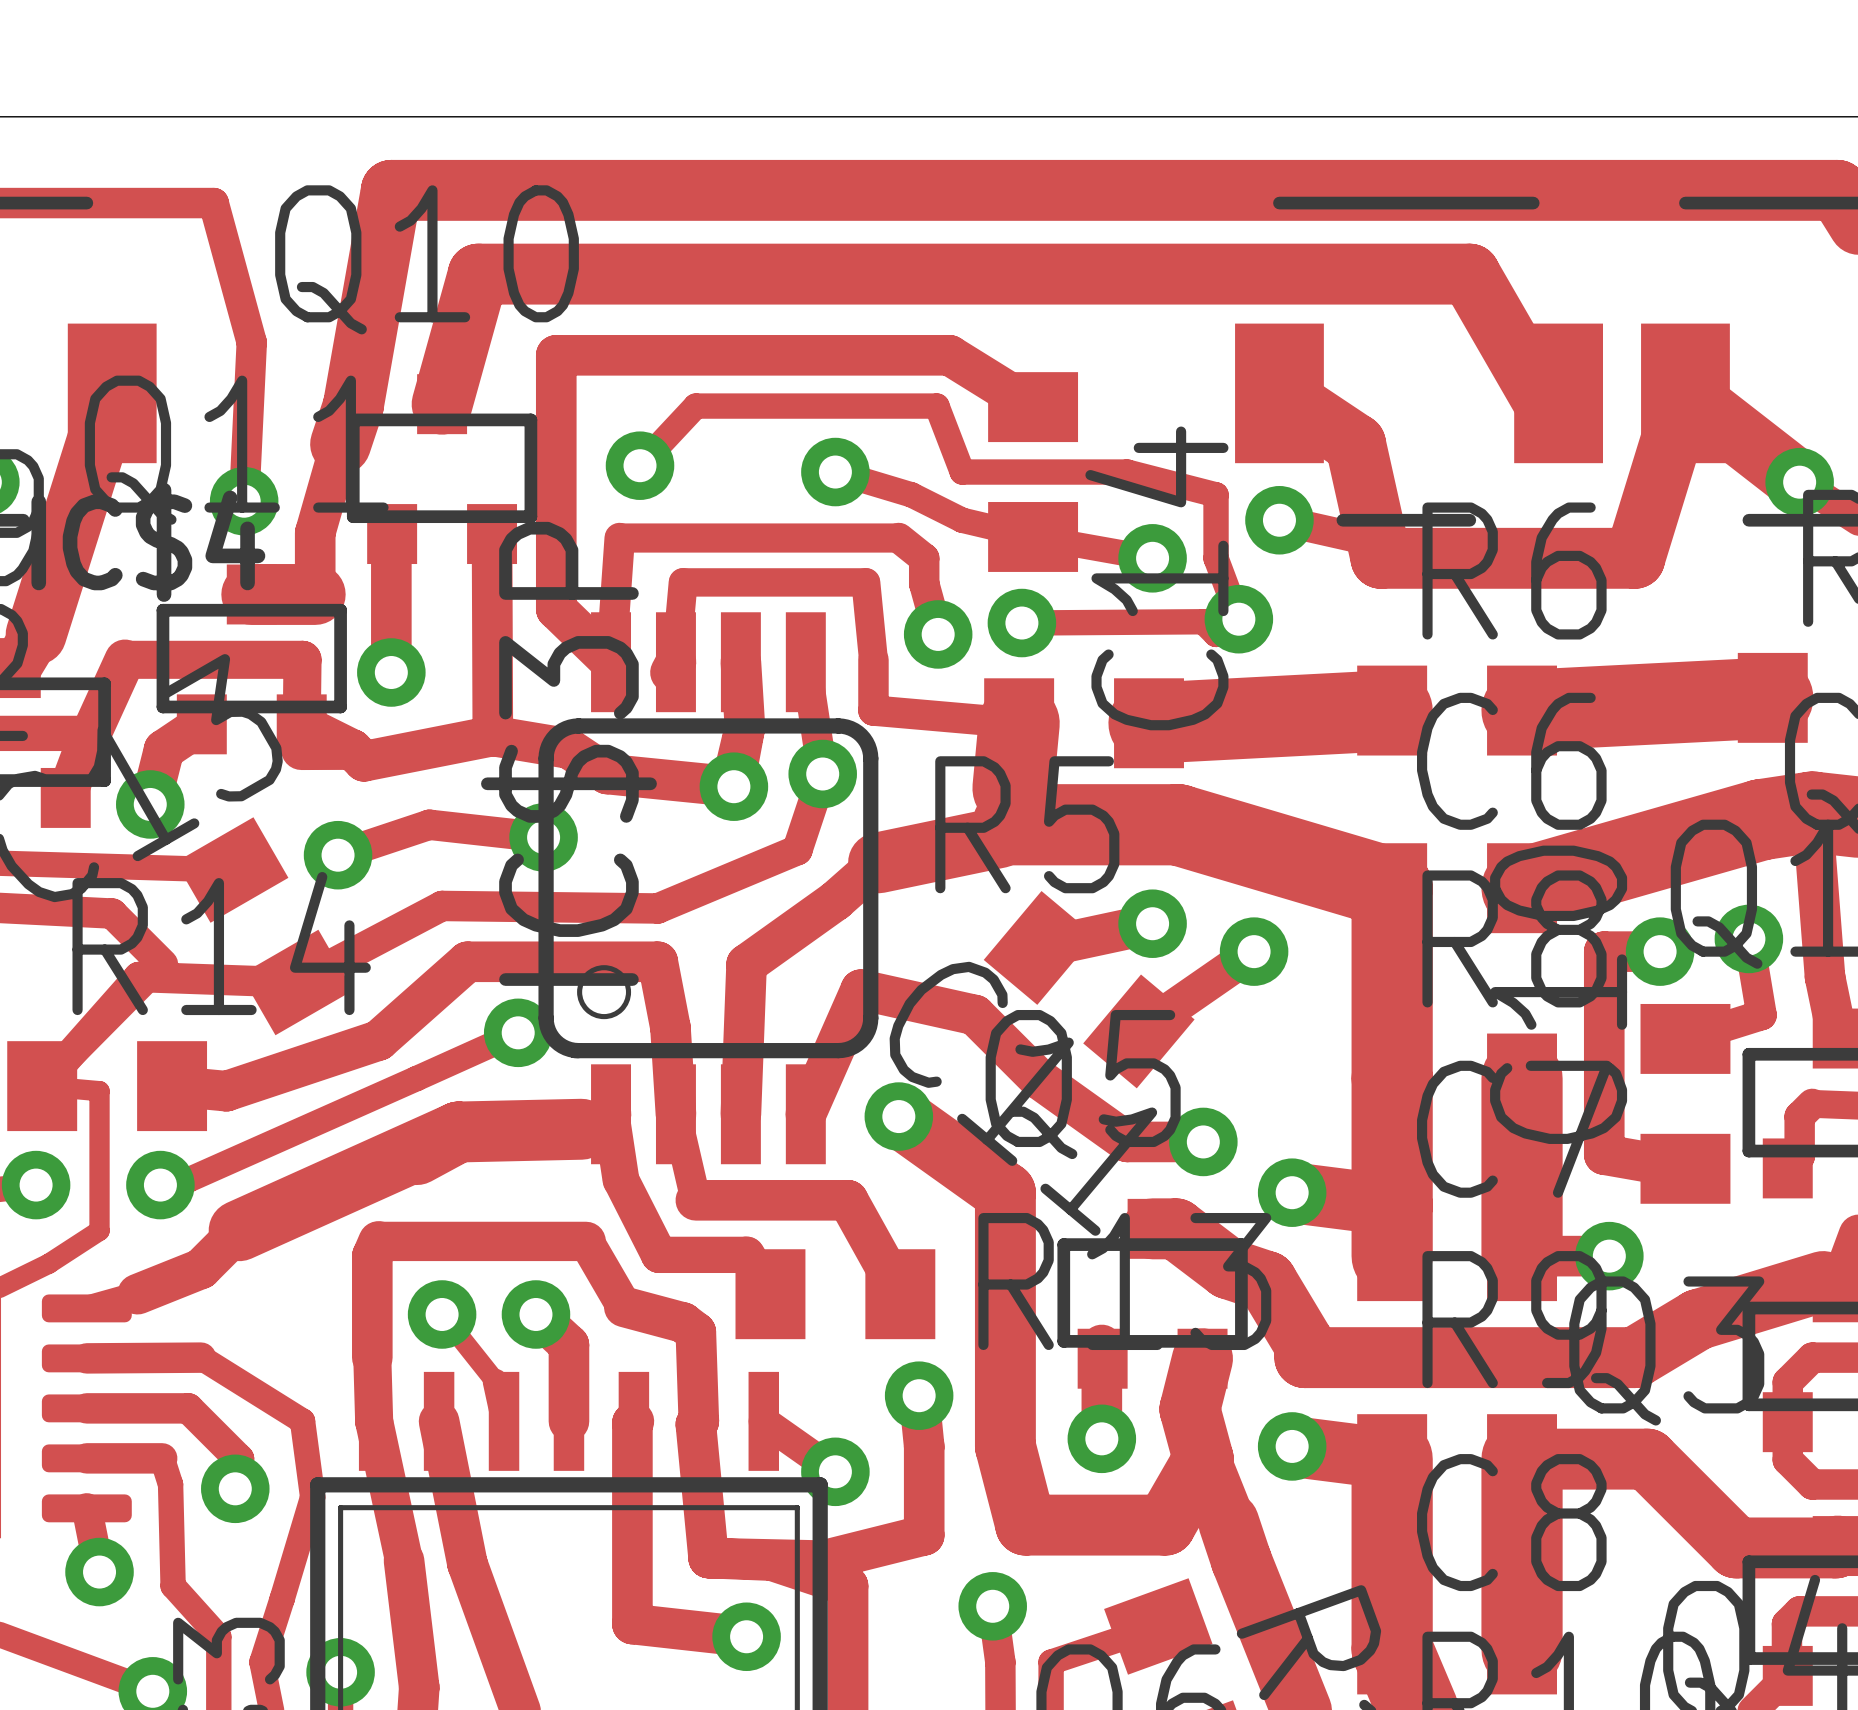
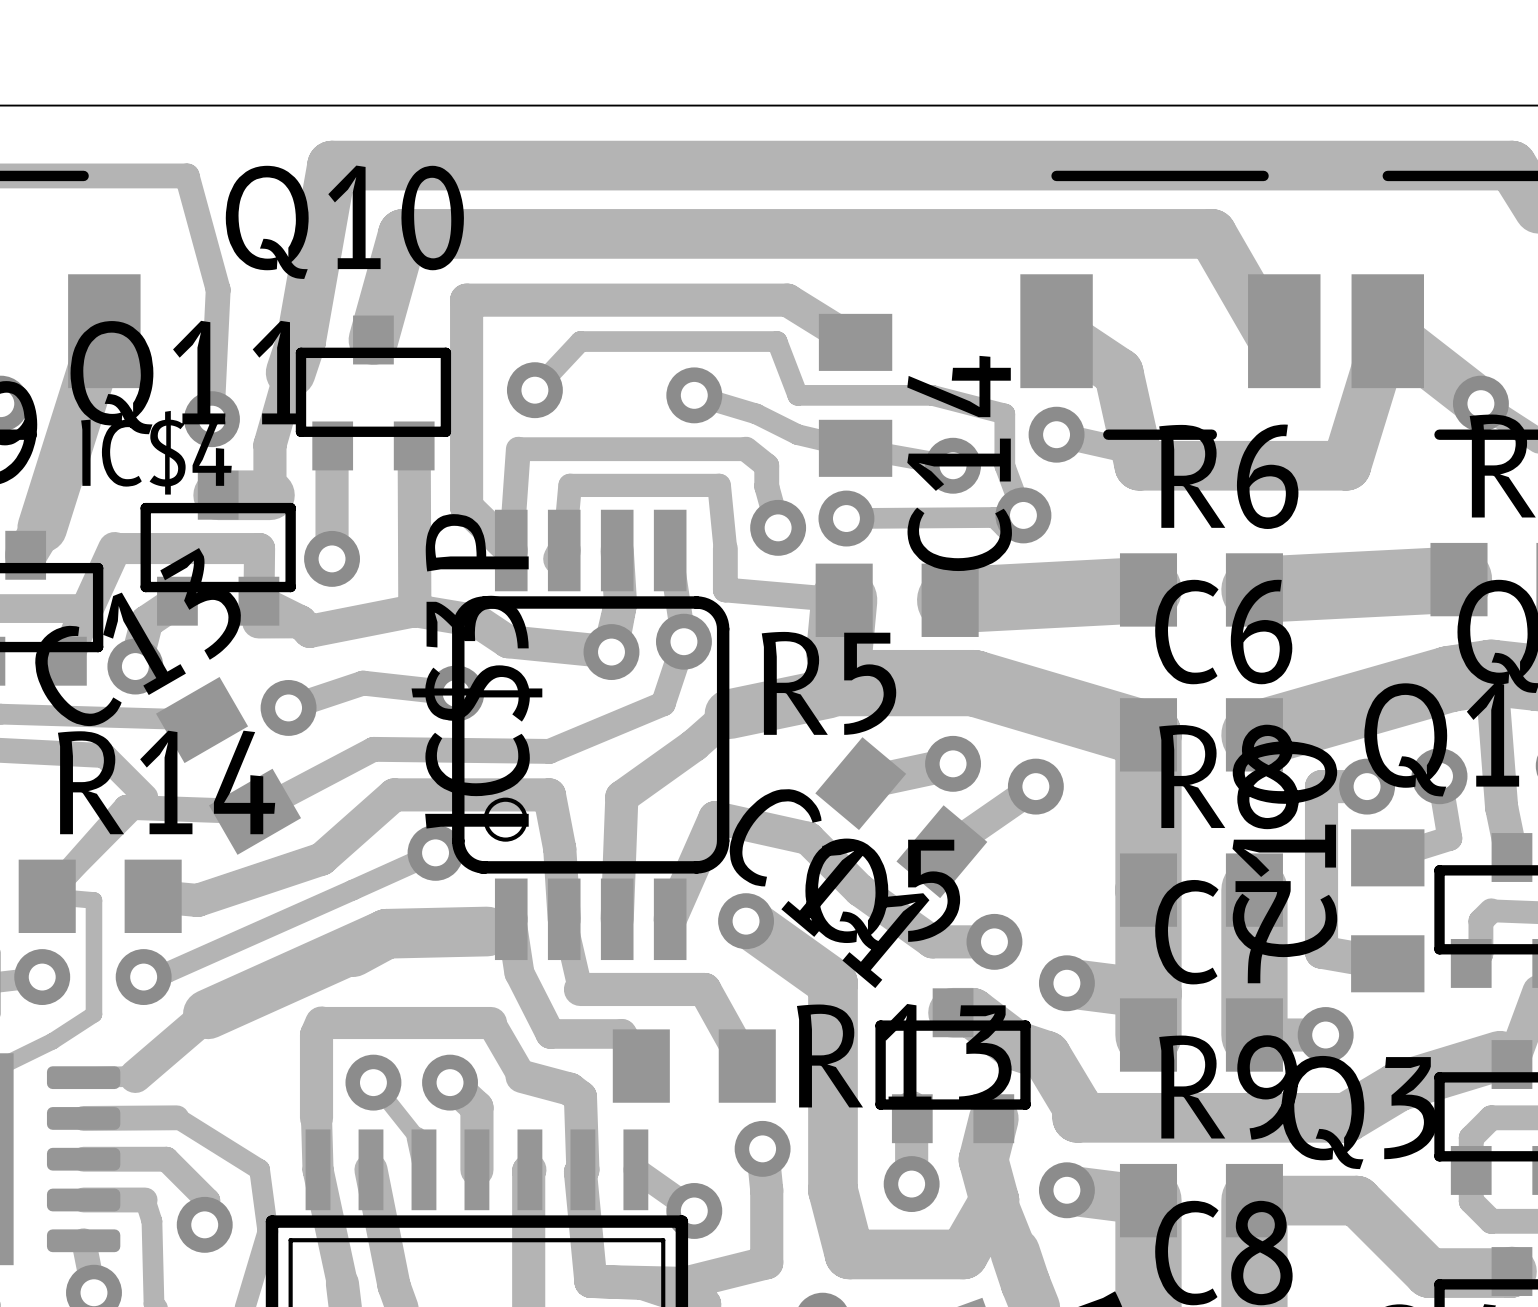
track: (239, 1230) (201, 1268) (137, 1294) (86, 1308) -> (207, 1014) (135, 1076) (83, 1077)

